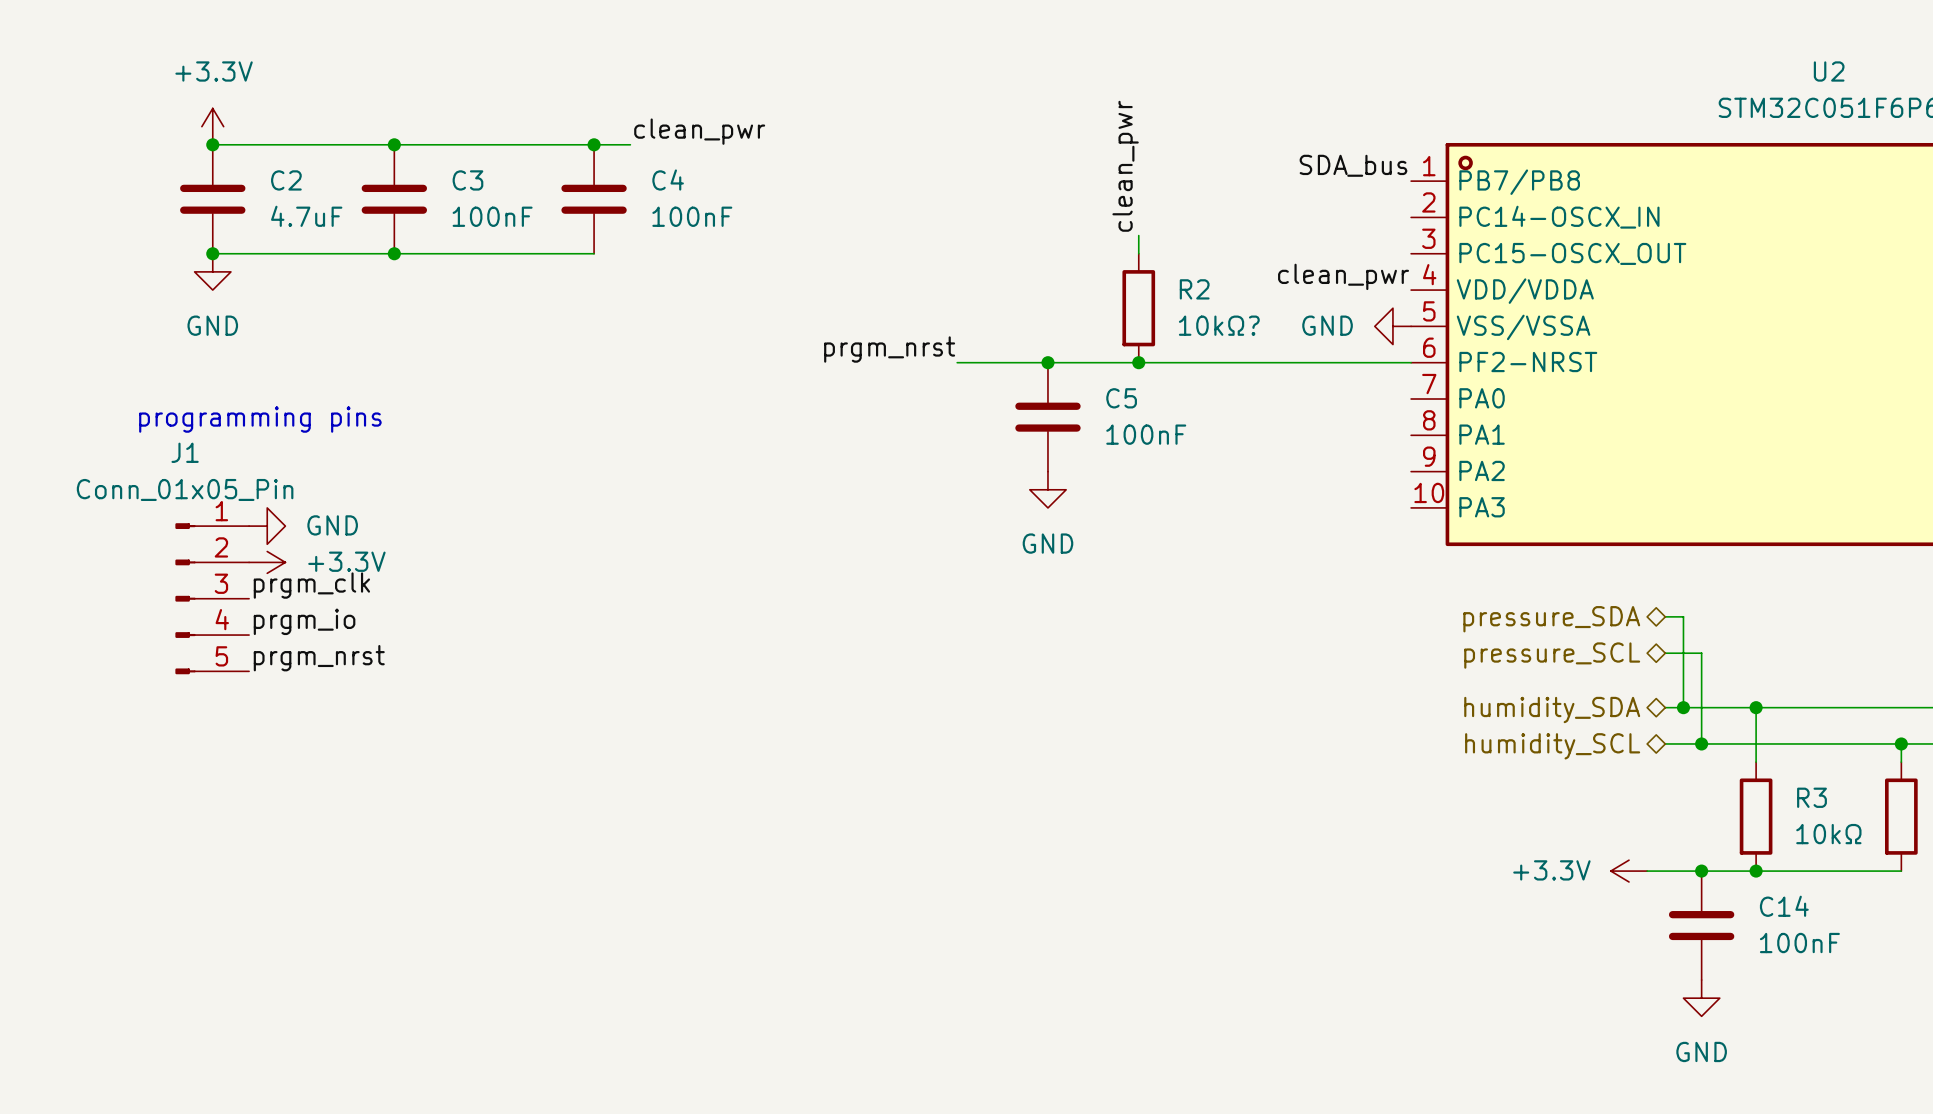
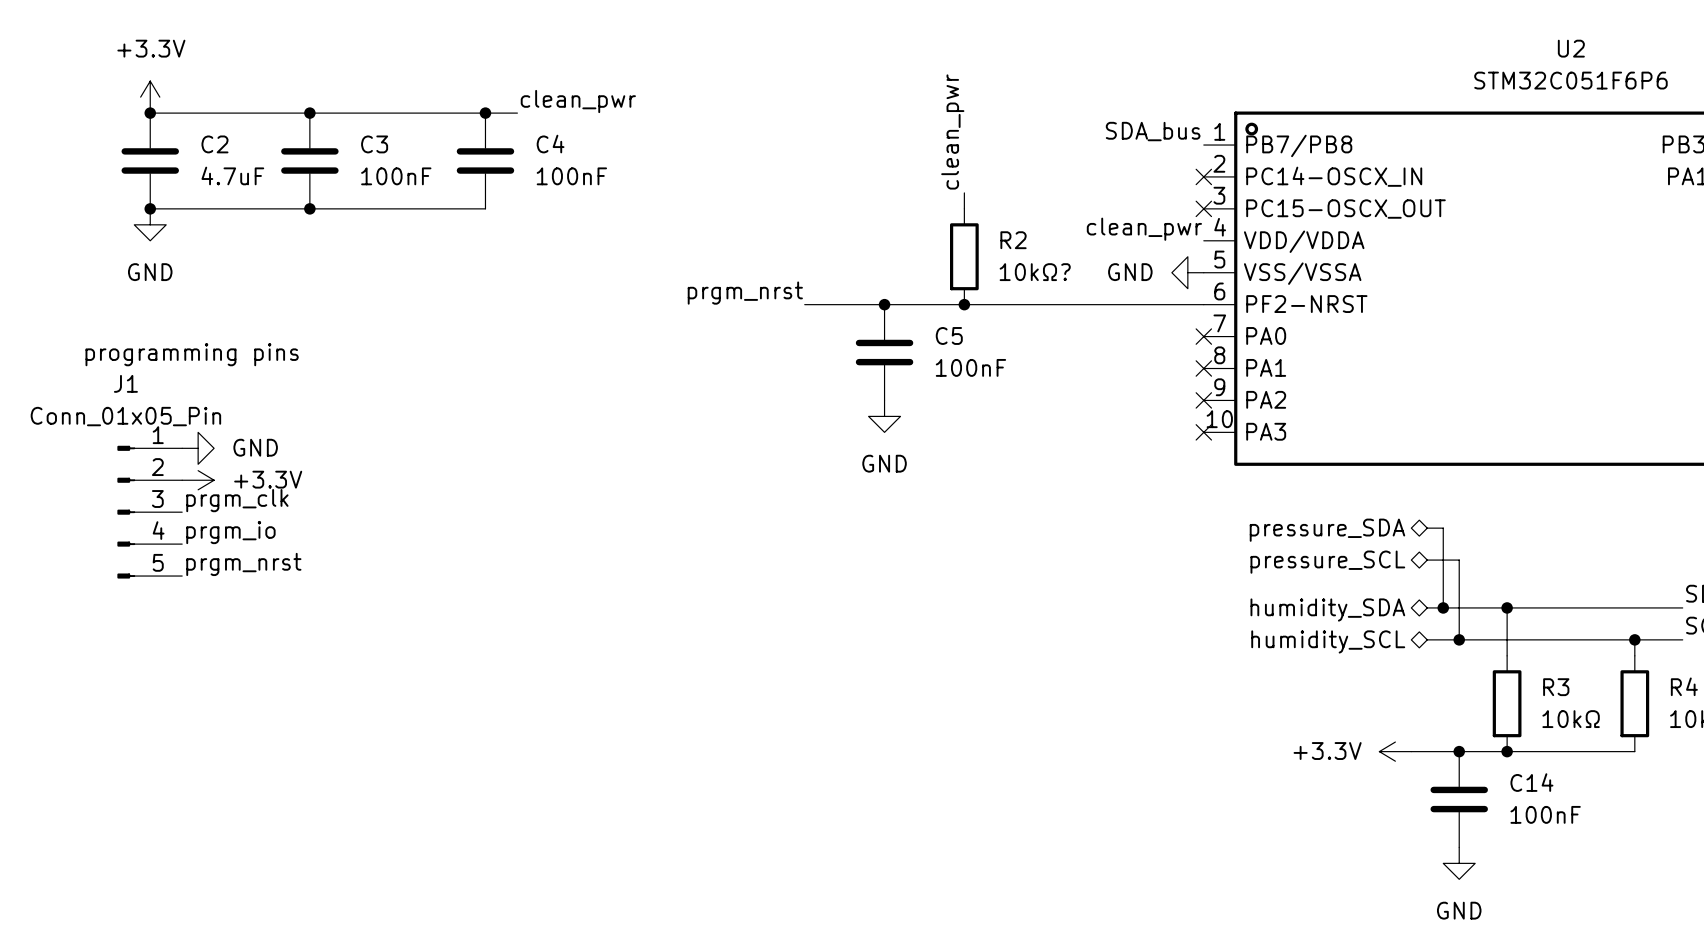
no-connect mark: none -> (1203, 176)
no-connect mark: none -> (1203, 208)
no-connect mark: none -> (1203, 336)
no-connect mark: none -> (1203, 368)
no-connect mark: none -> (1203, 400)
no-connect mark: none -> (1203, 432)

